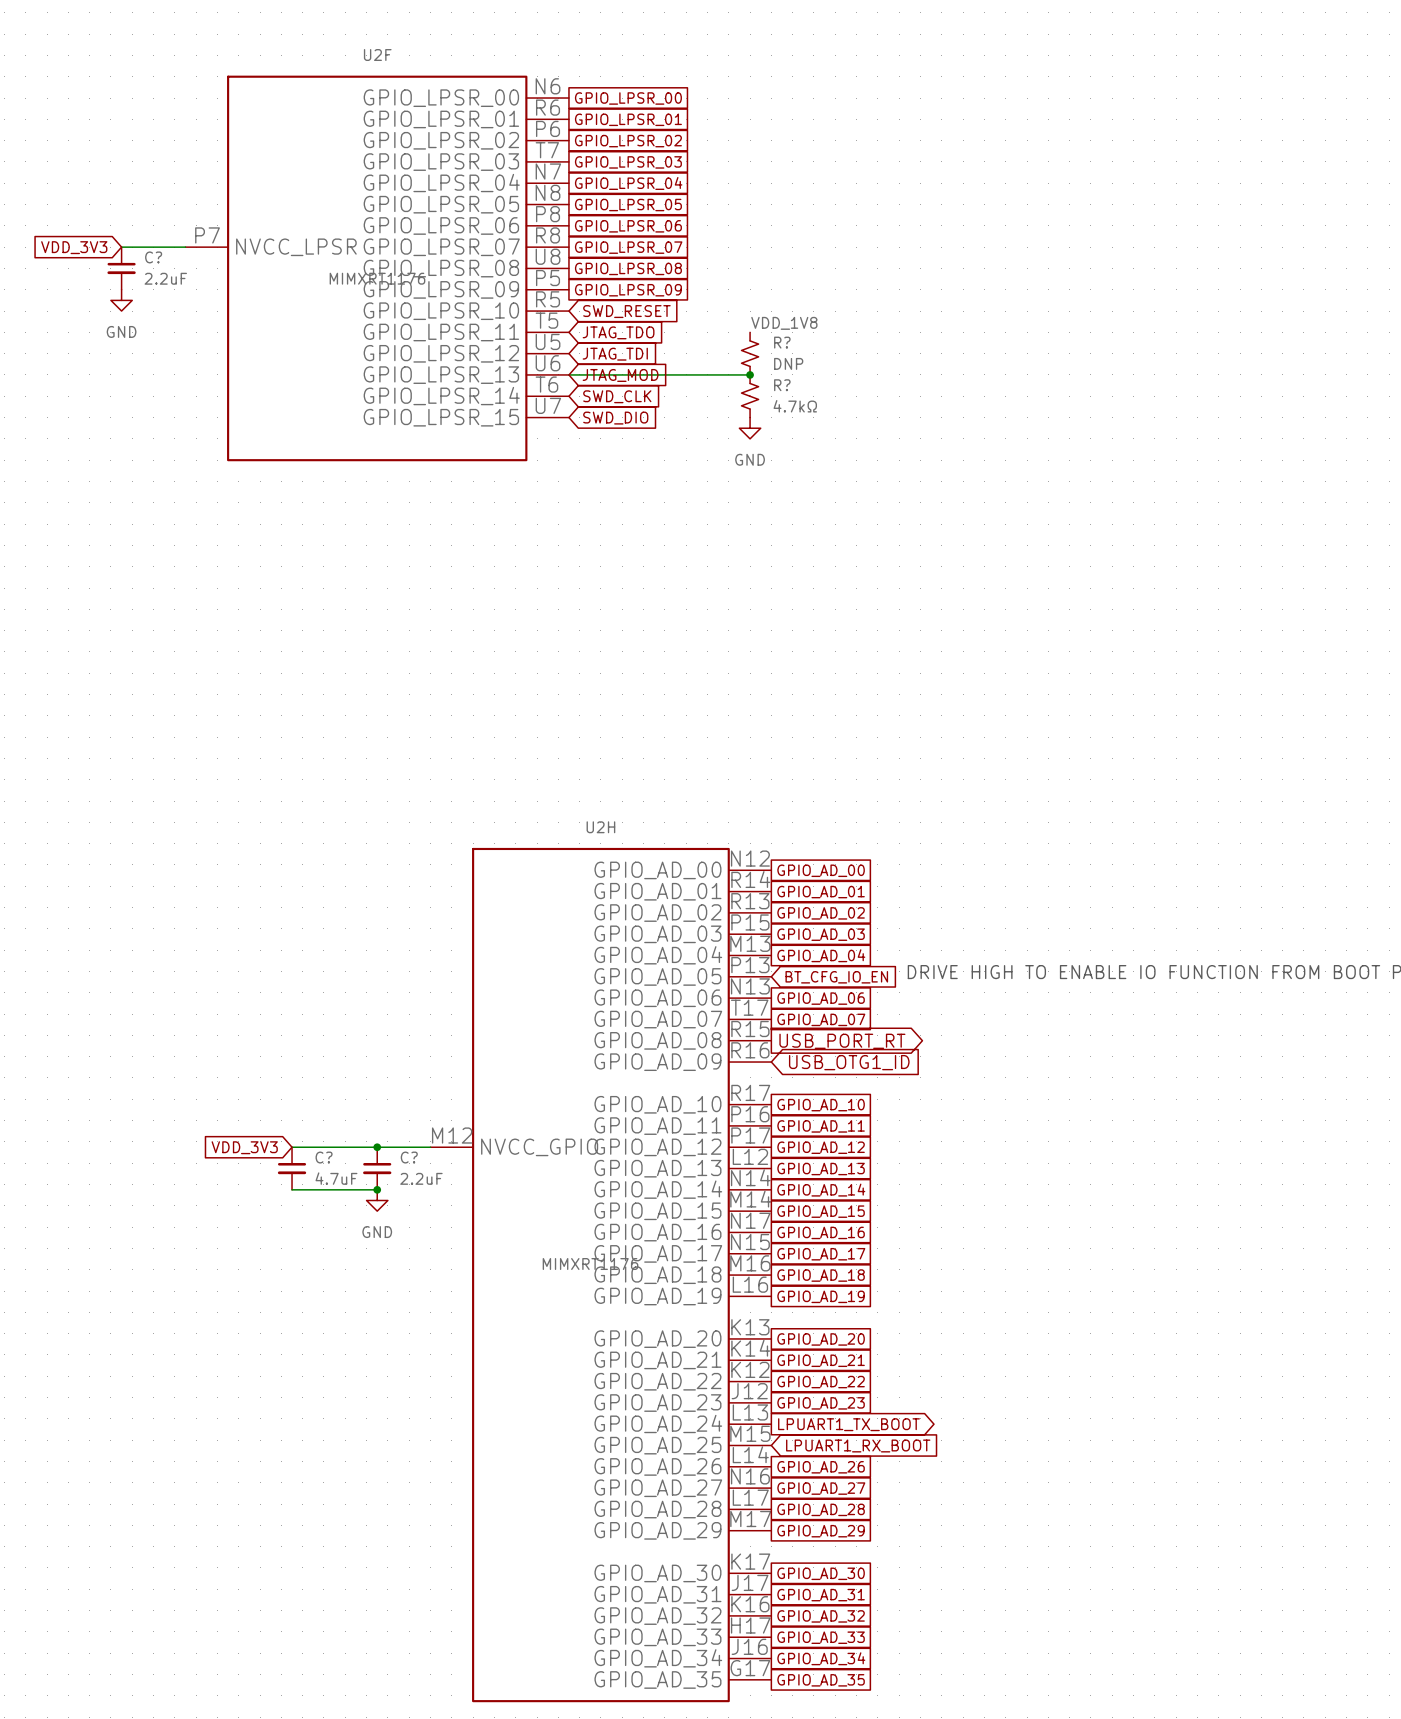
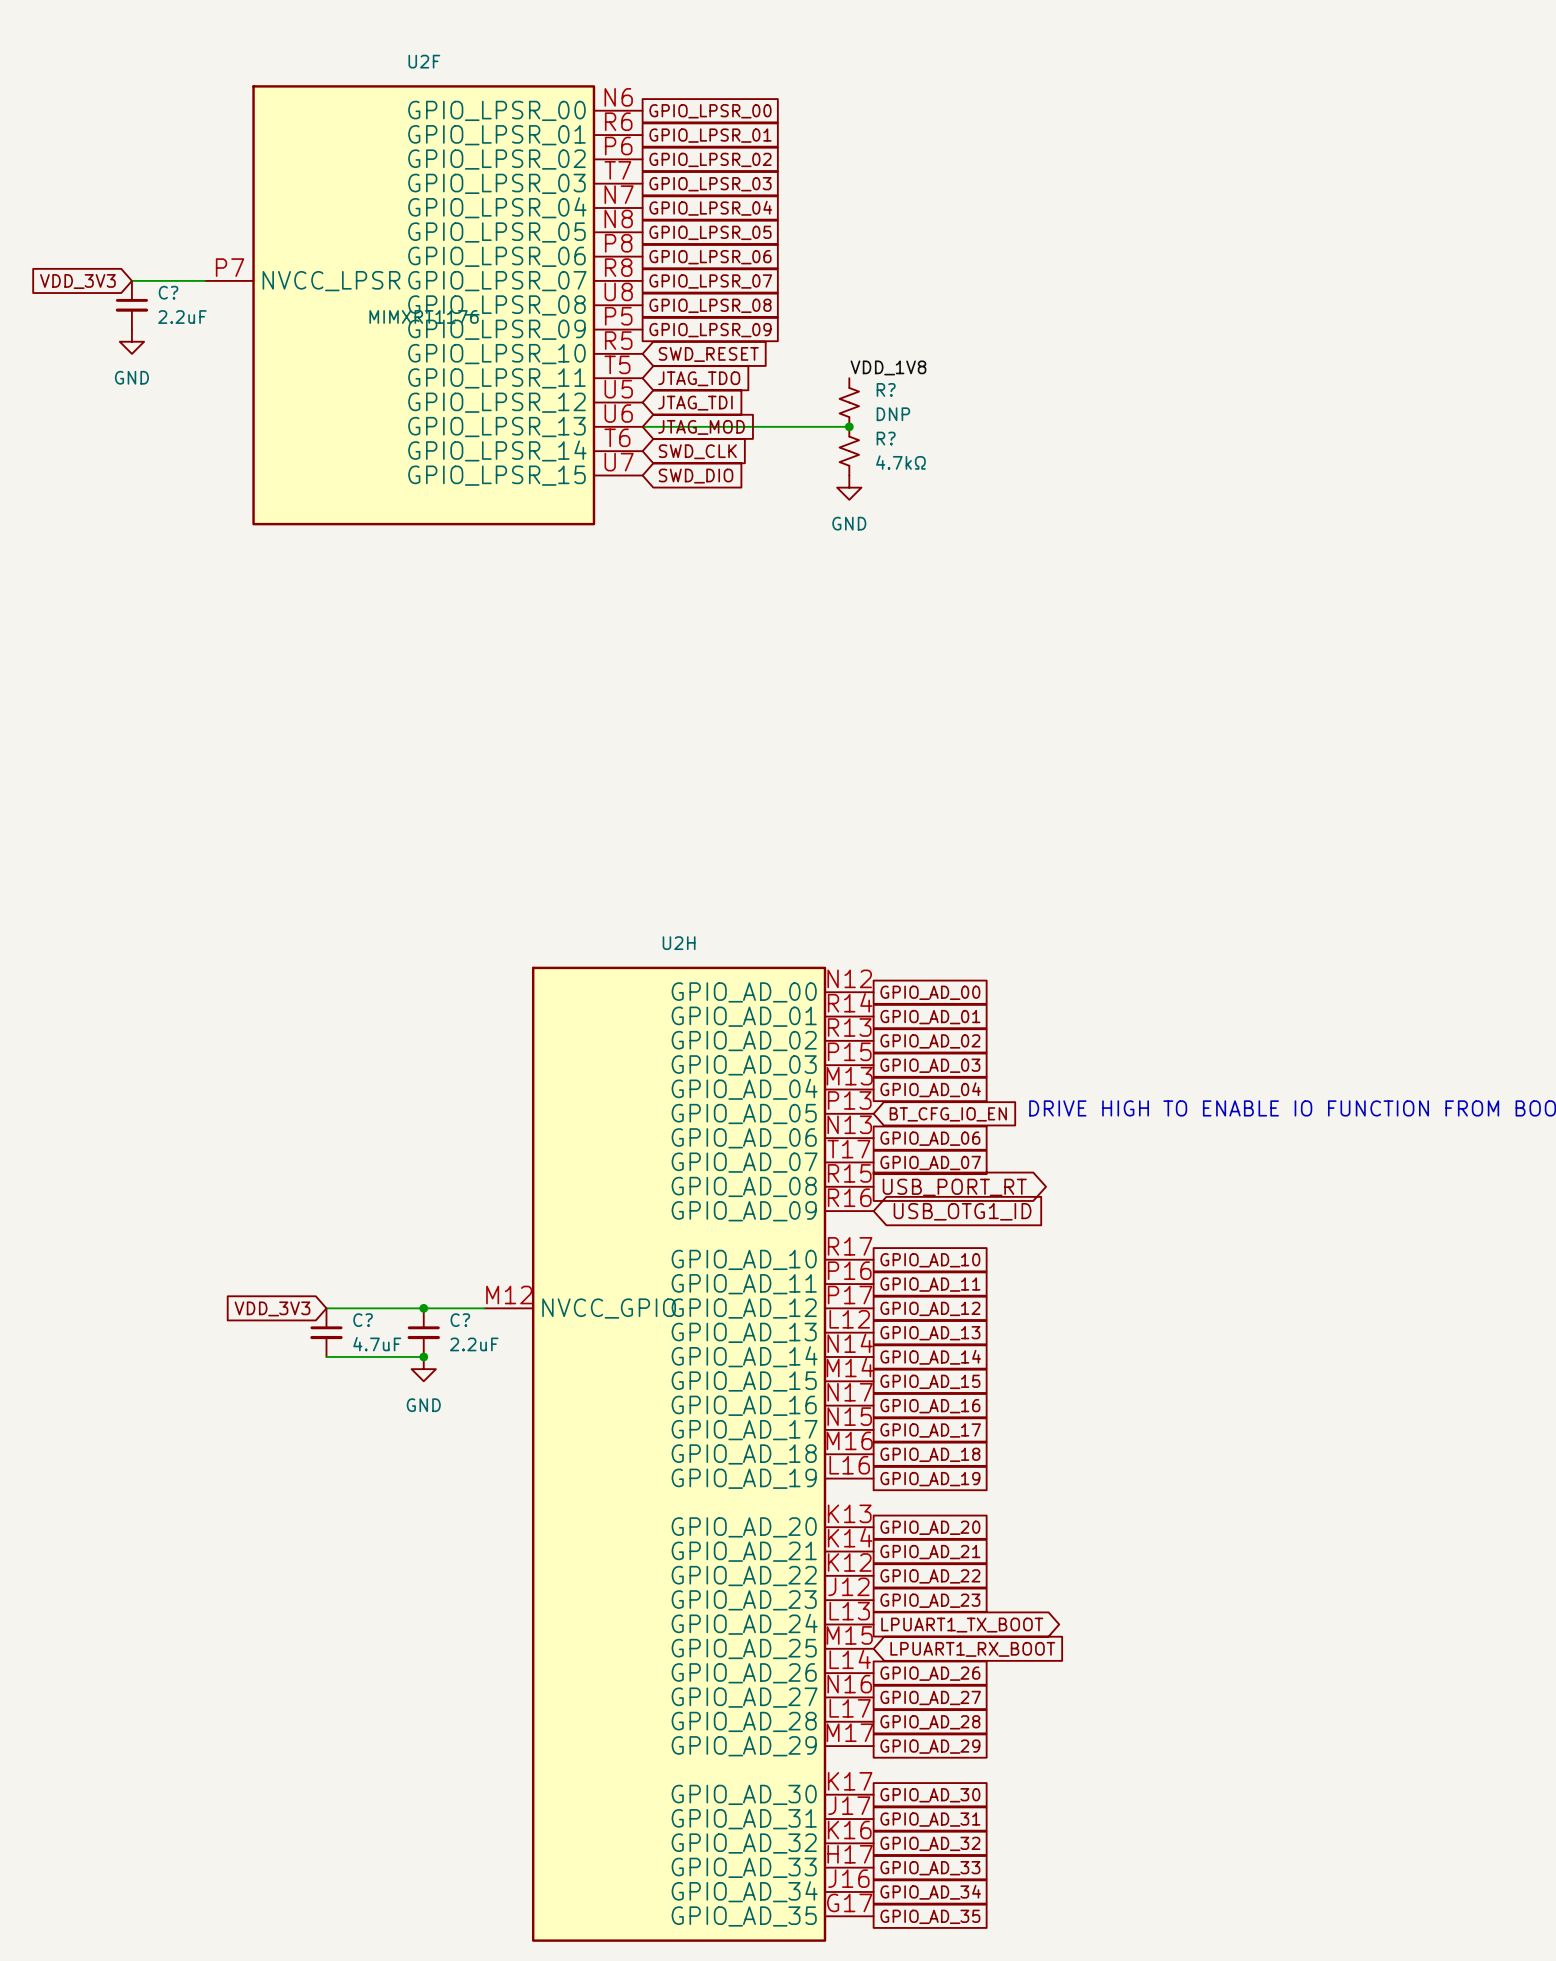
U2H value: MIMXRT1176 (590, 1264) -> none

